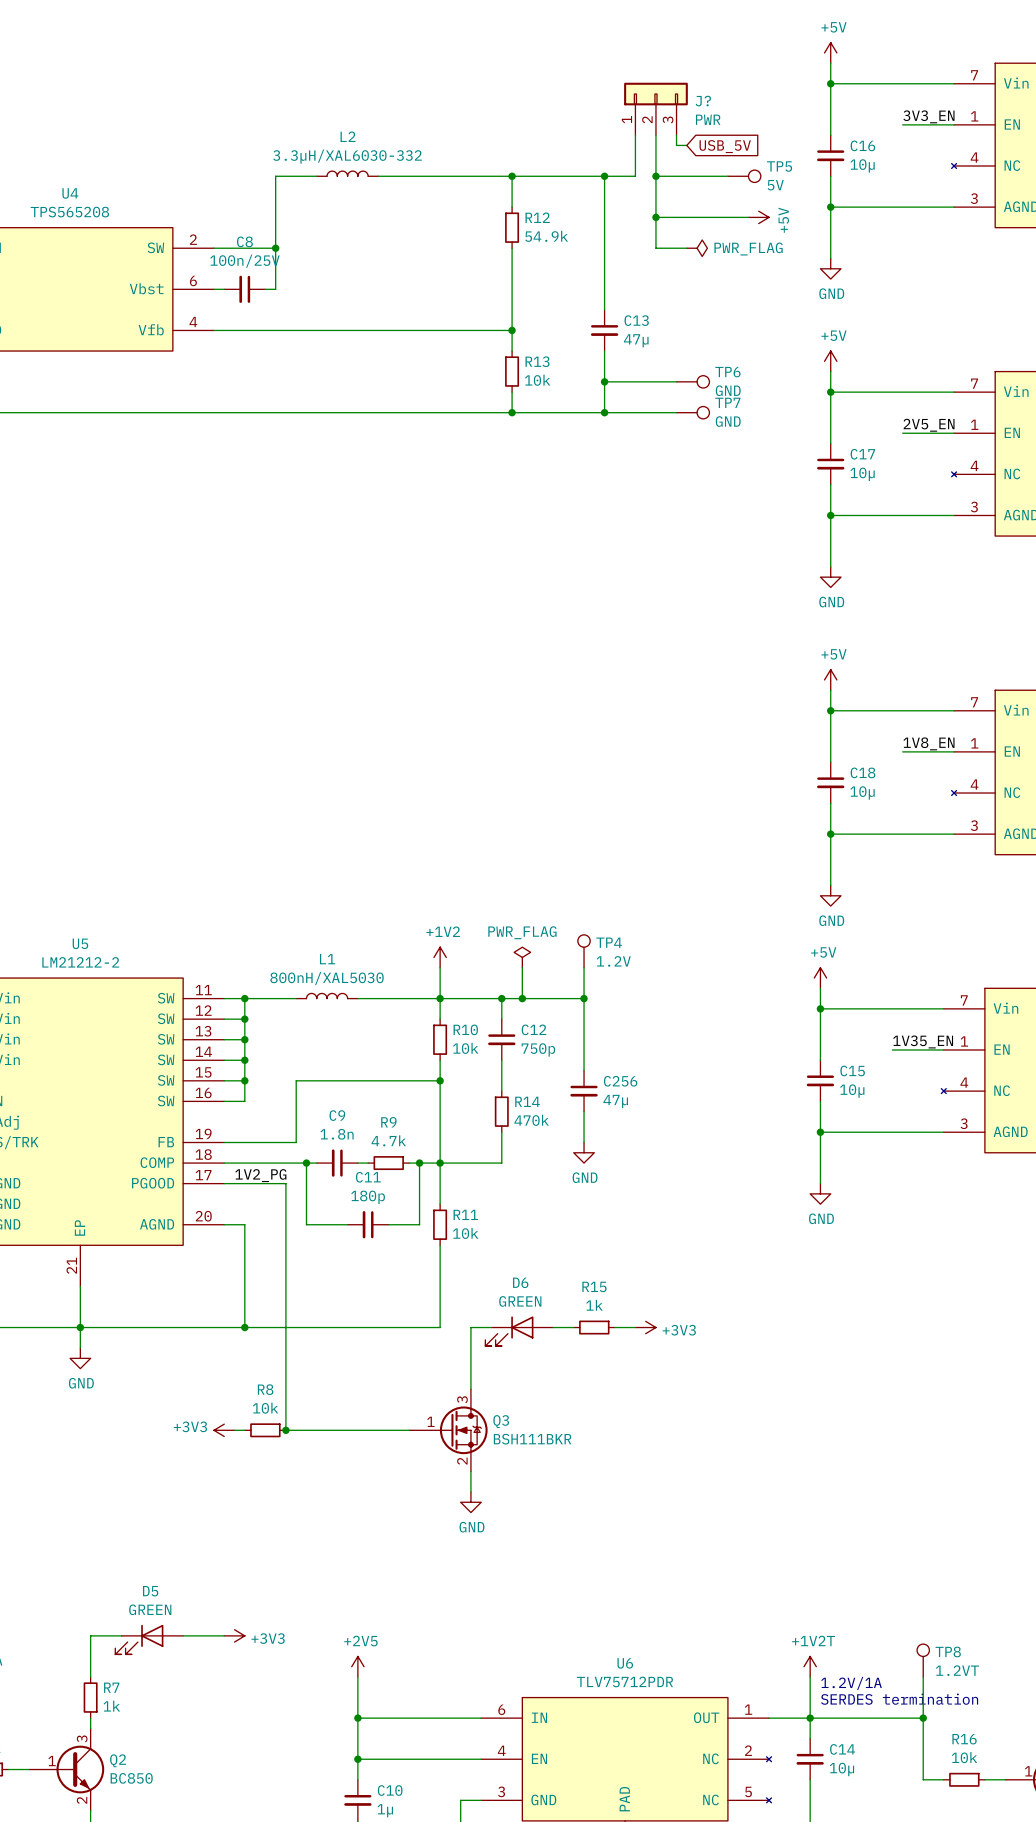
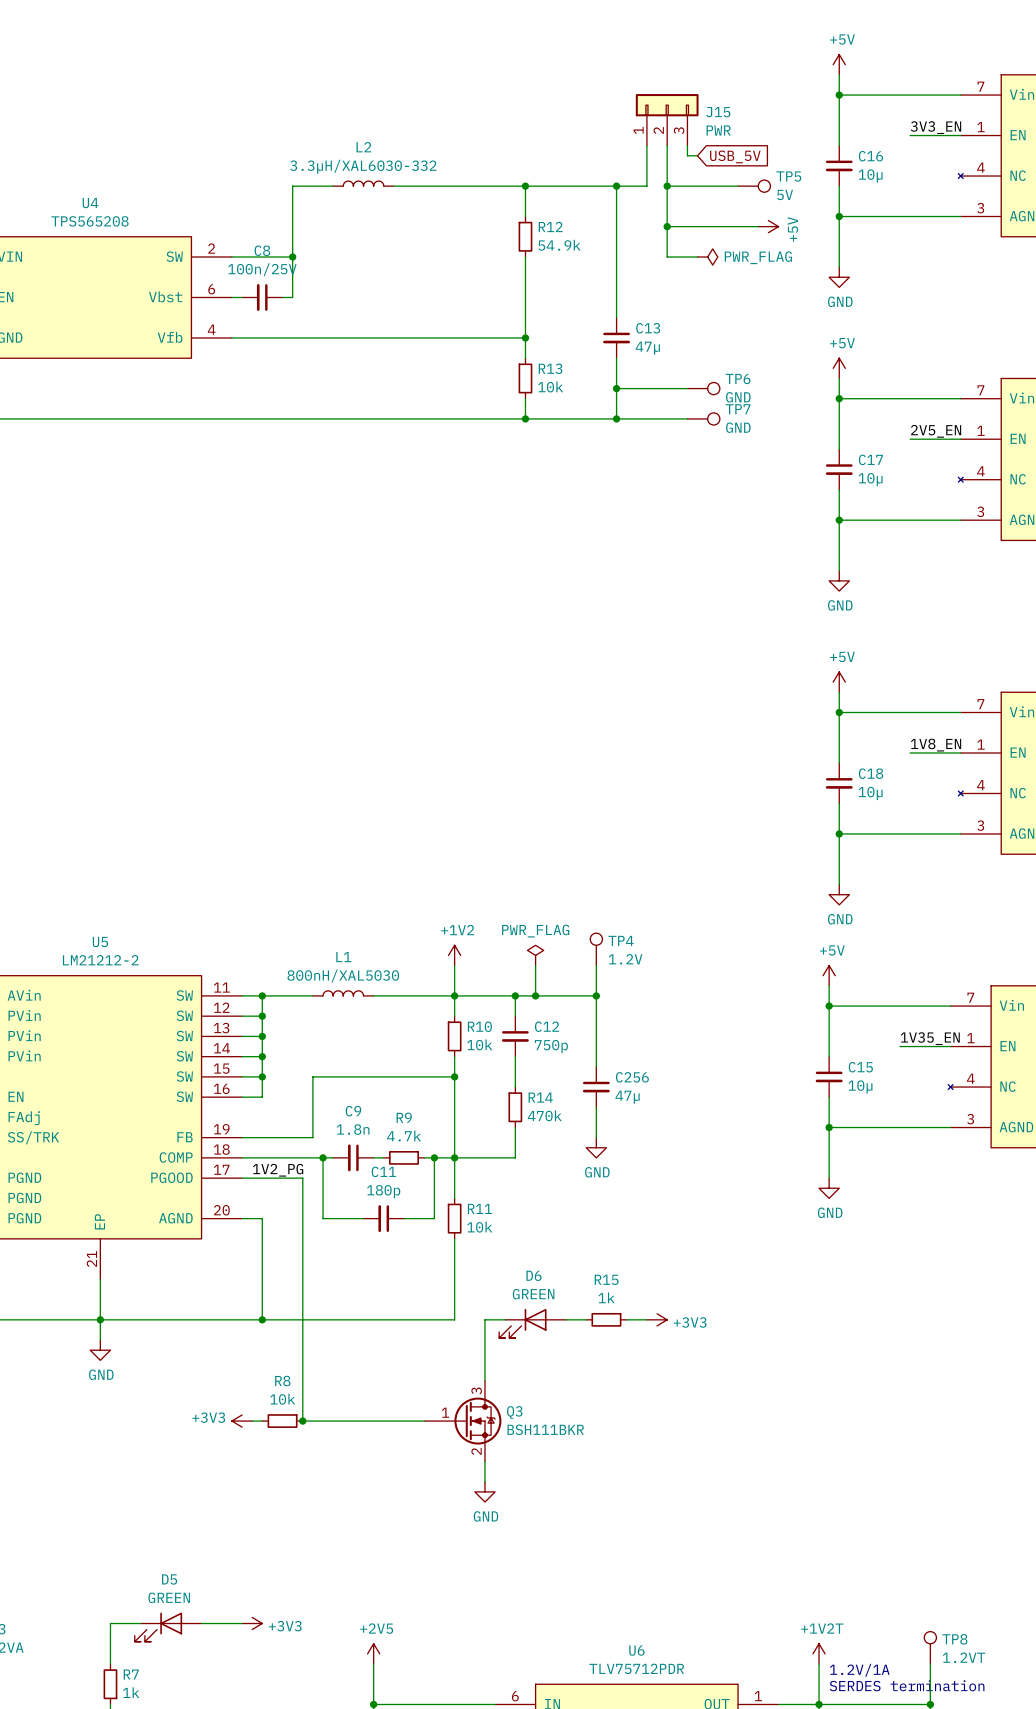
J? name: J? (703, 101) -> J15 (718, 112)

